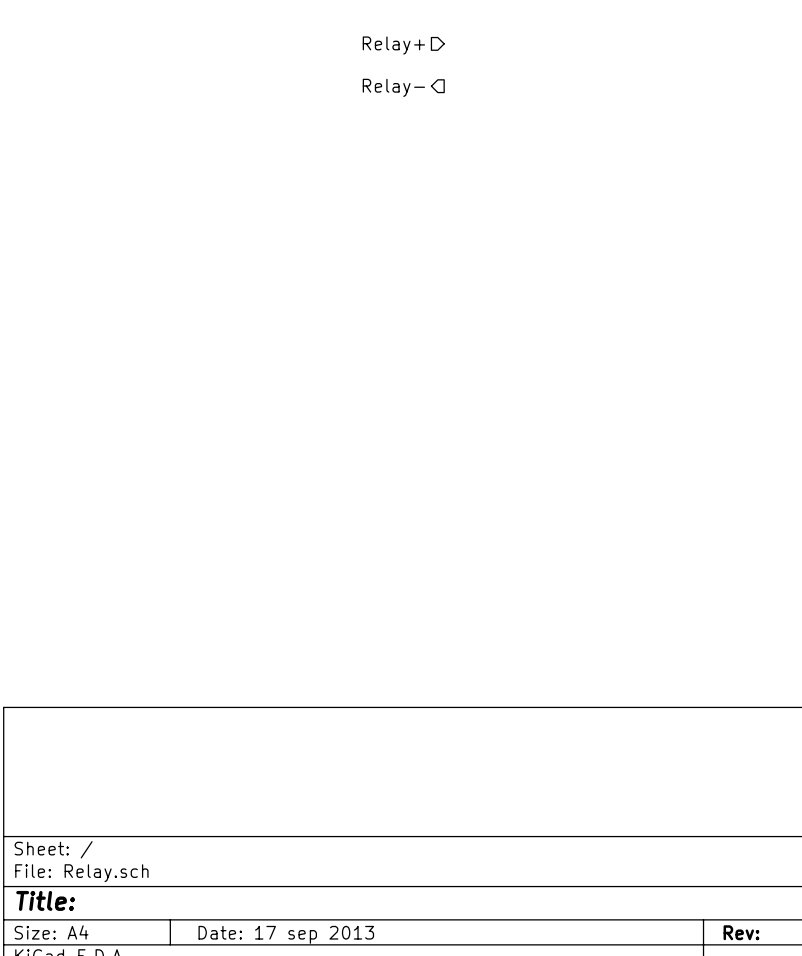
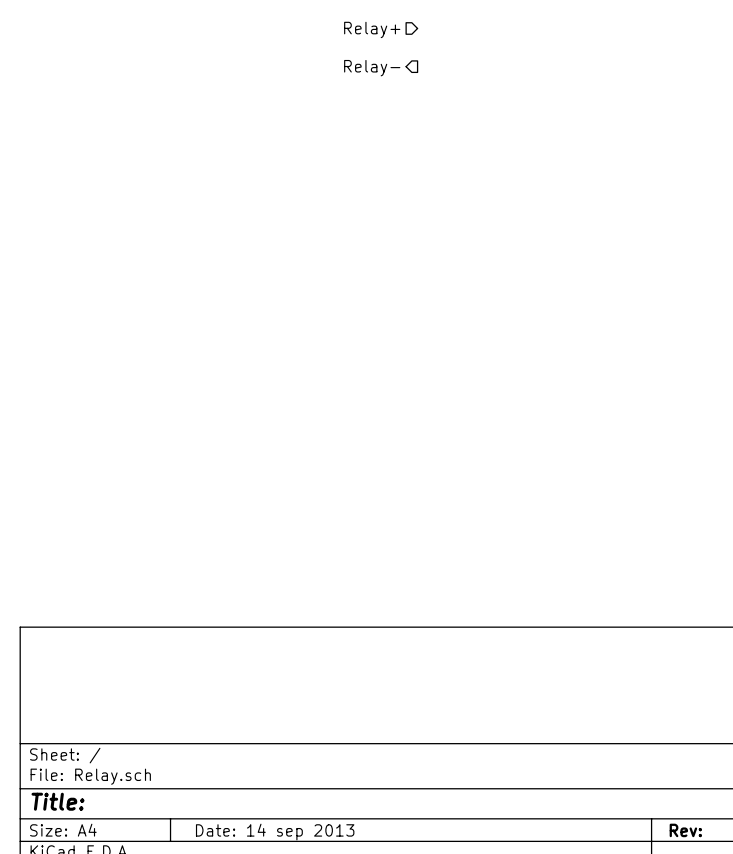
title block: Date: 17 sep 2013 (286, 934) -> Date: 14 sep 2013 (275, 832)

